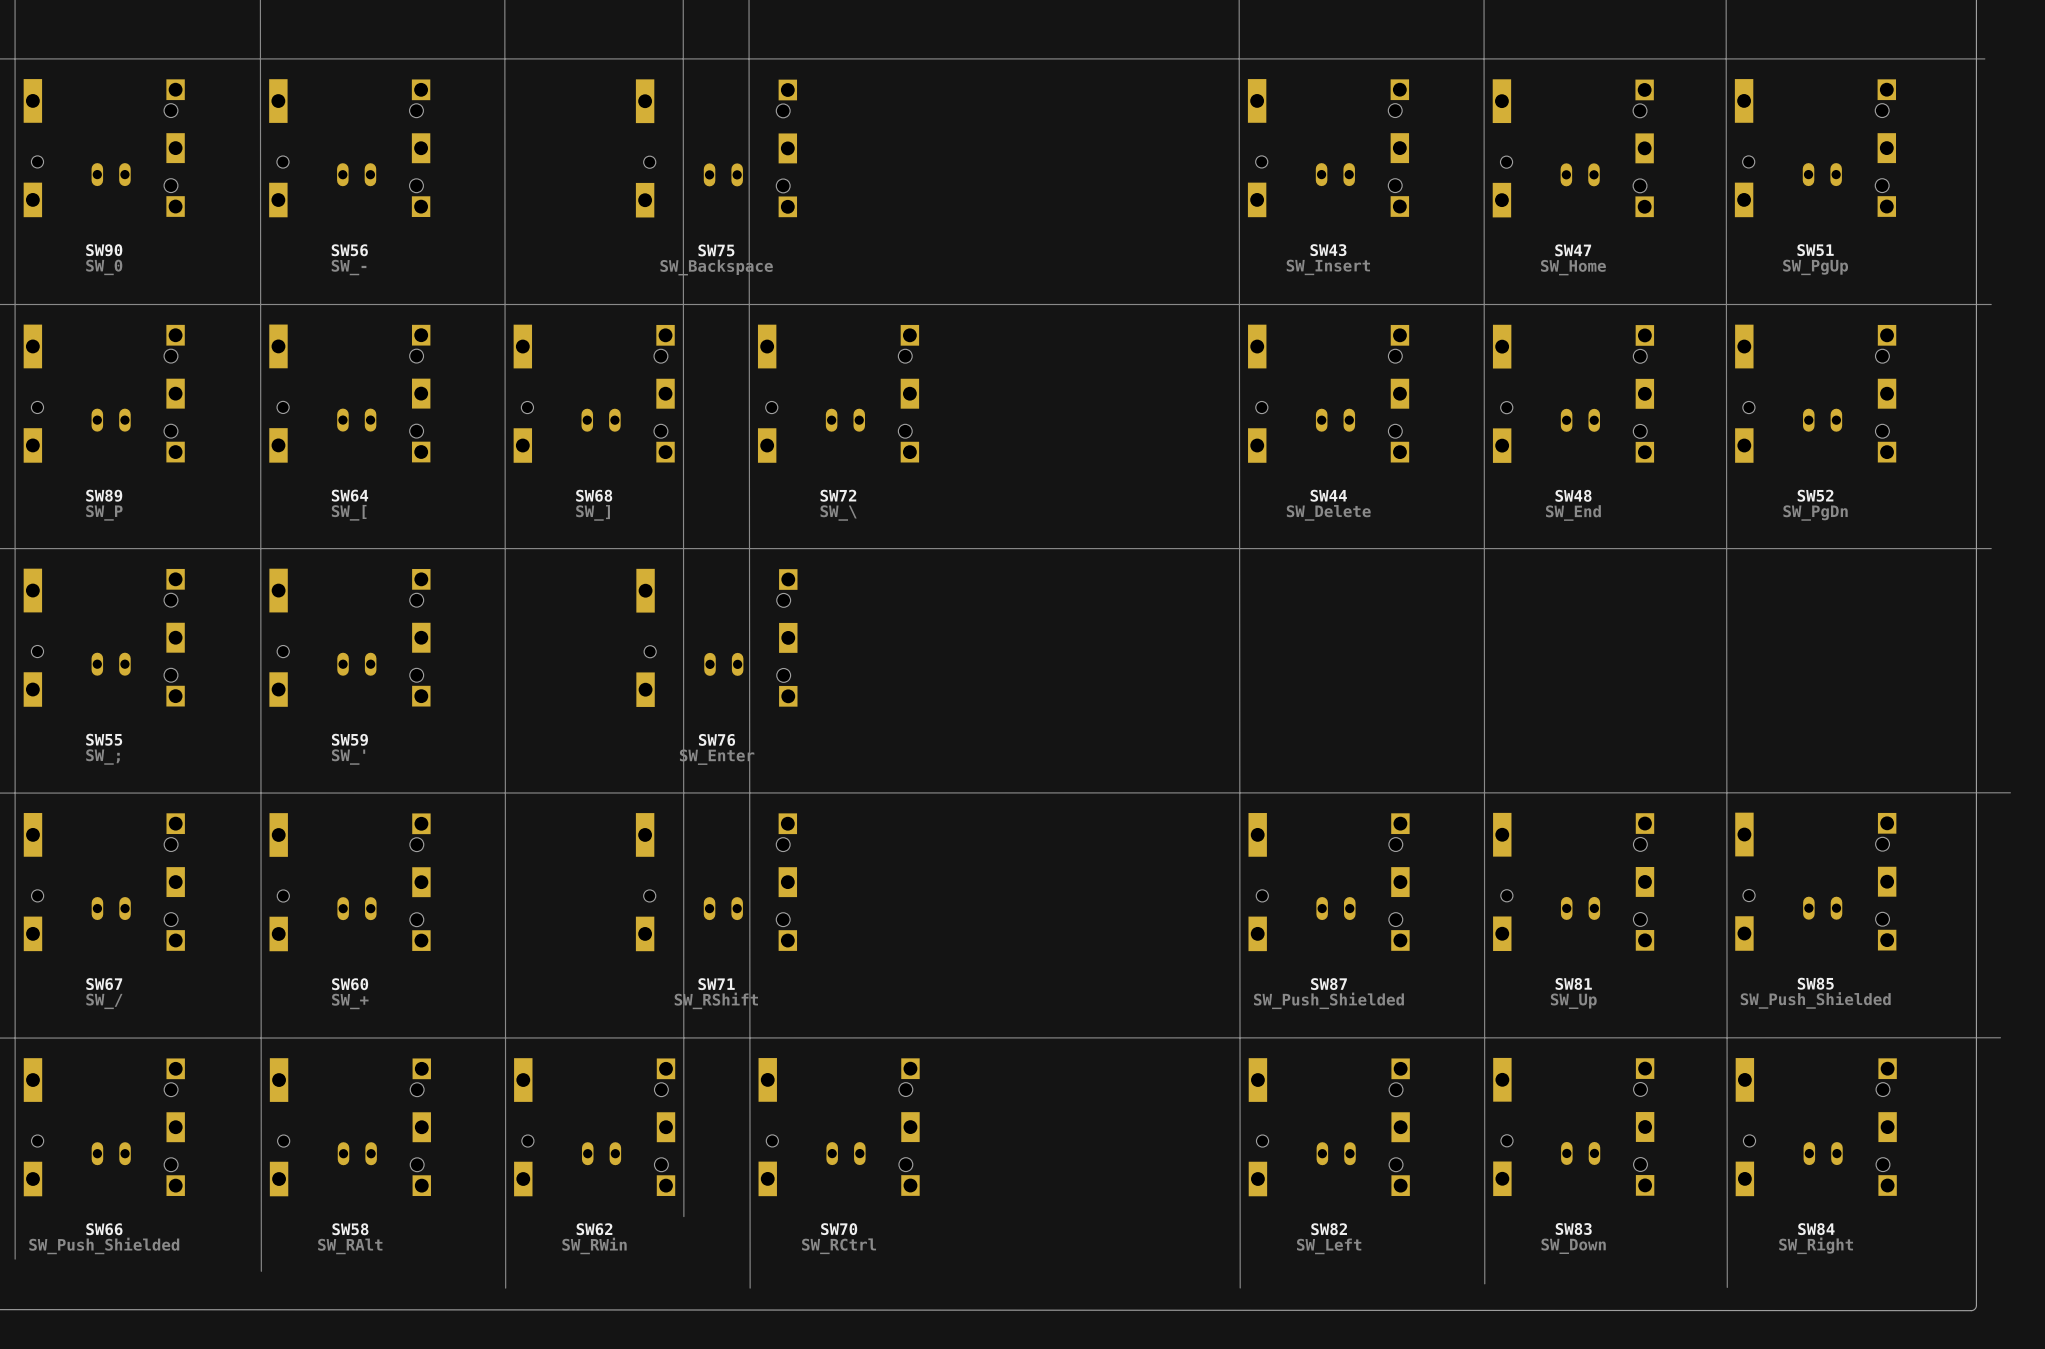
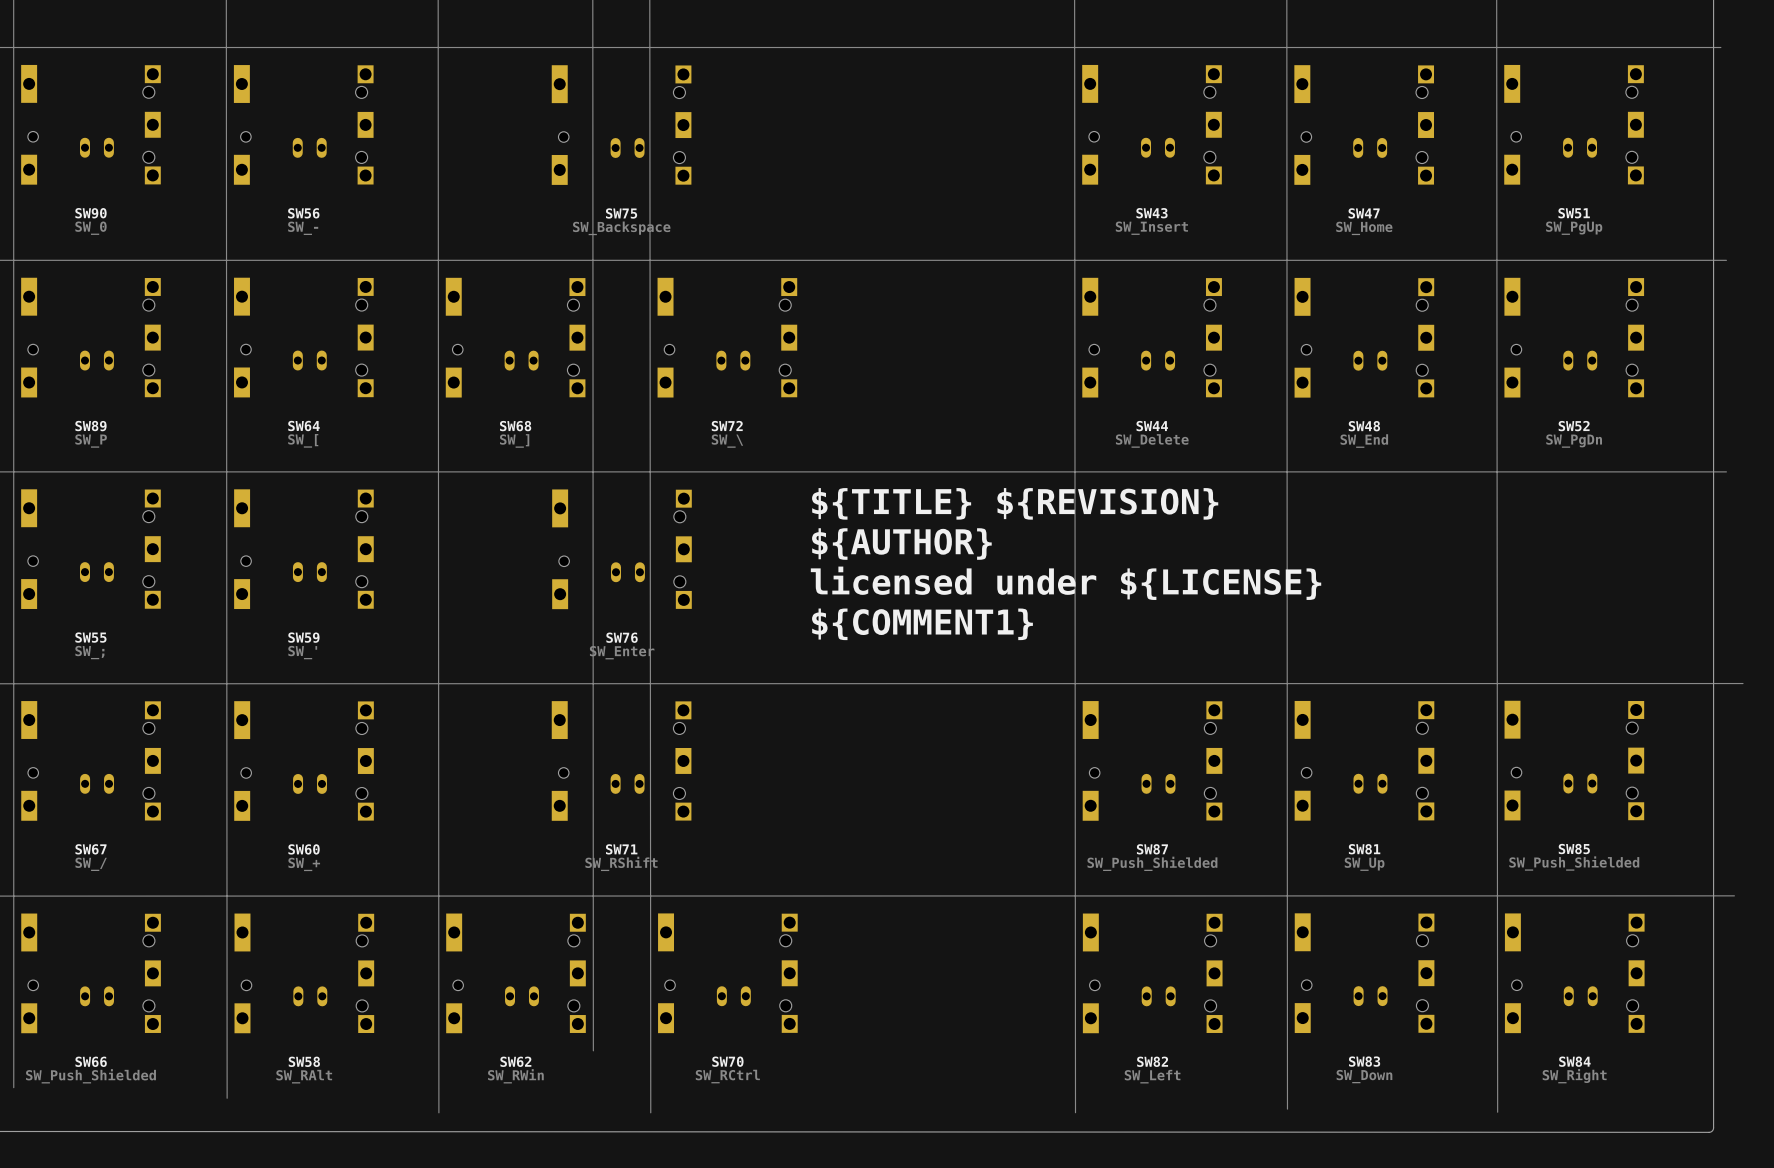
text: none -> ${TITLE} ${REVISION} (1015, 503)
text: none -> ${AUTHOR} (901, 544)
text: none -> licensed under ${LICENSE} (1066, 583)
text: none -> ${COMMENT1} (922, 624)

